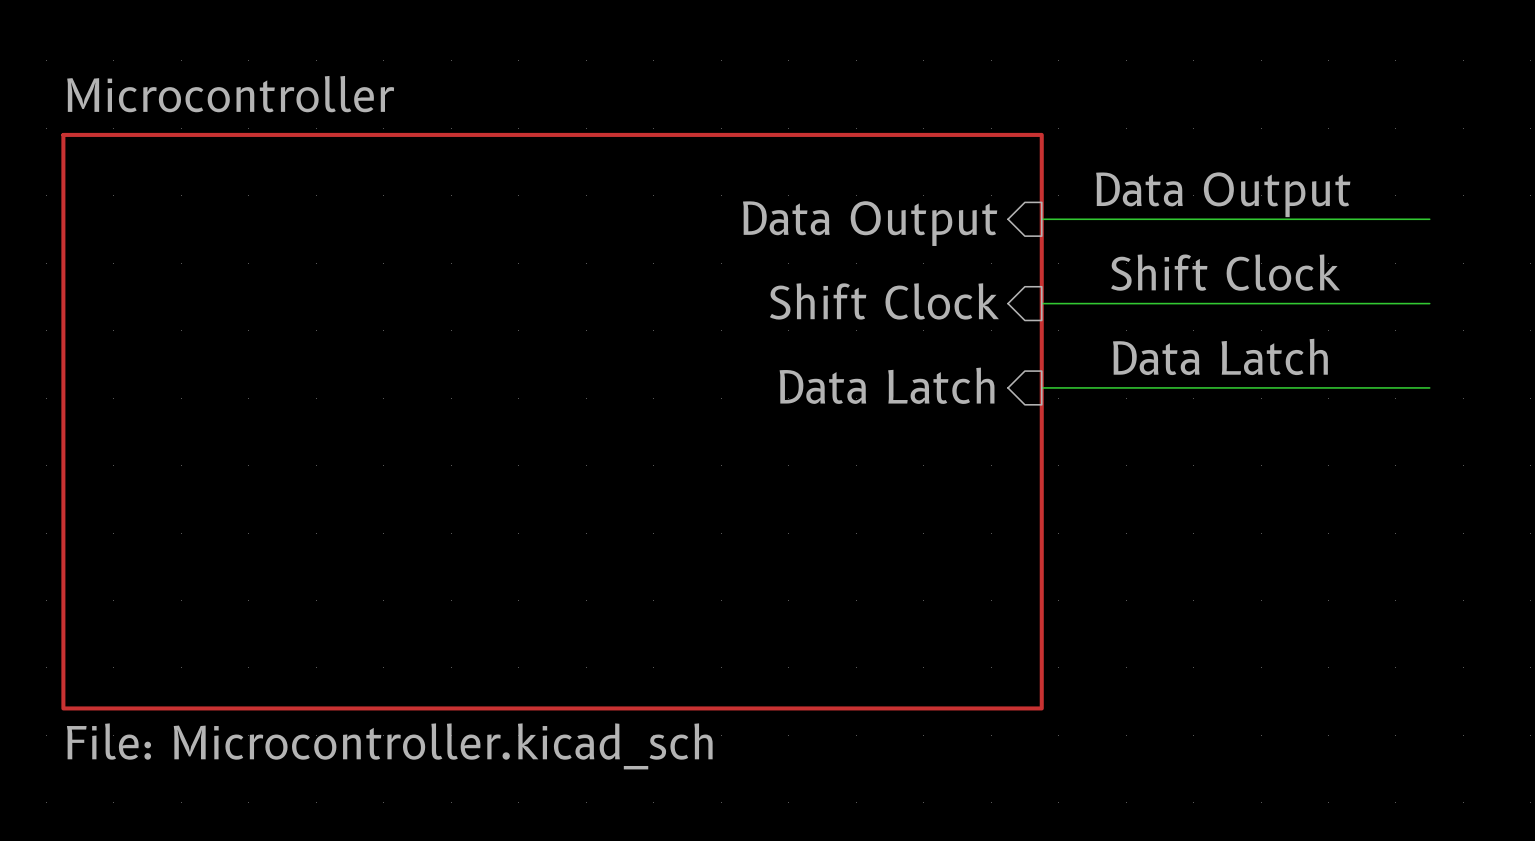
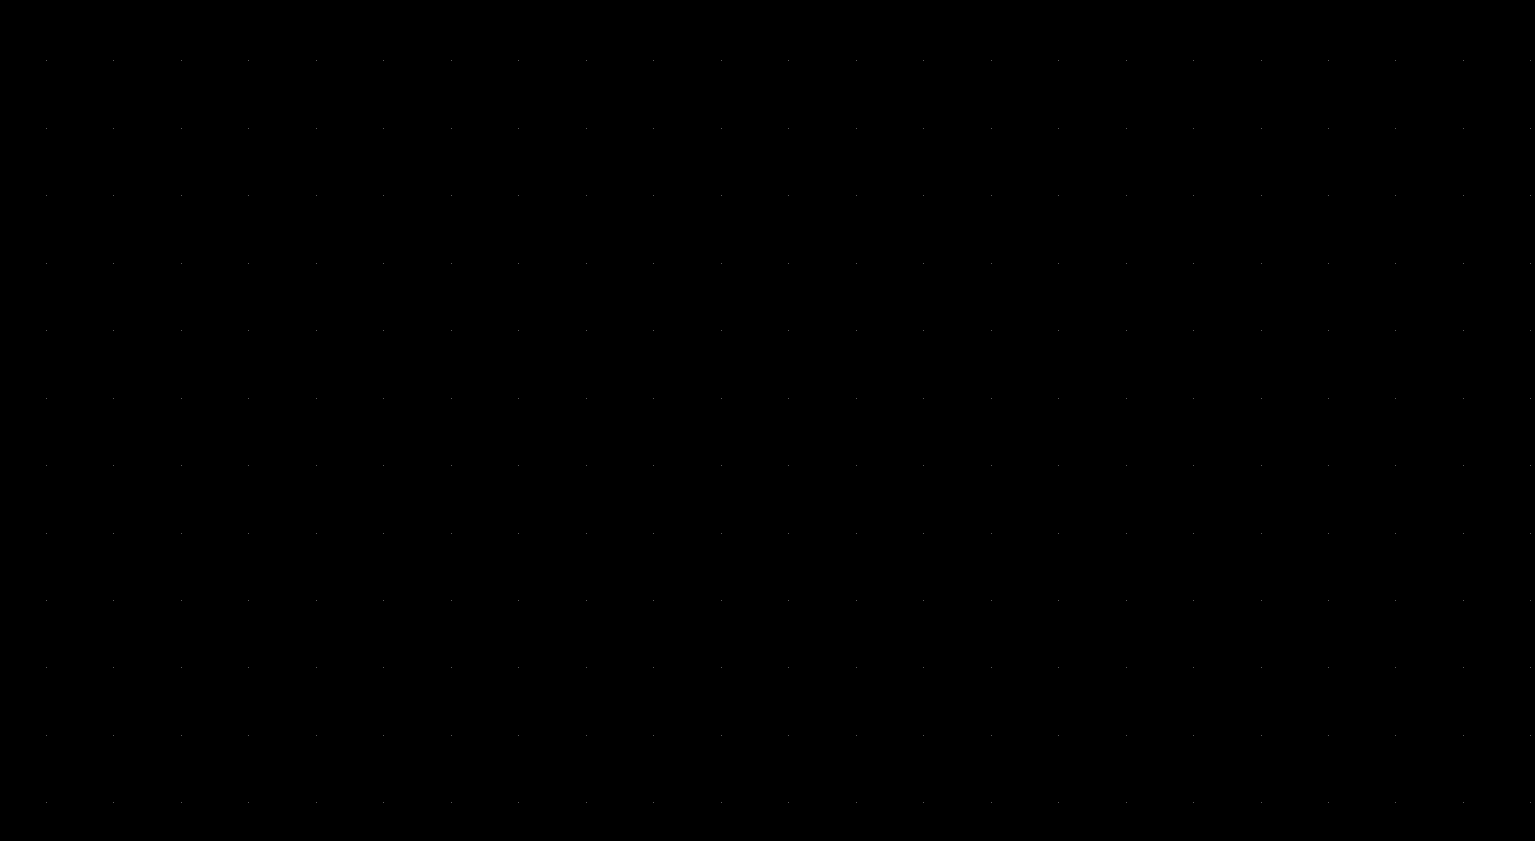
label: Data Output (1223, 194) -> none
wire: (1041, 219) (1429, 219) -> none
sheet pin: Data Output (870, 223) -> none
label: Shift Clock (1225, 272) -> none
sheet pin: Shift Clock (884, 301) -> none
wire: (1041, 303) (1429, 303) -> none
label: Data Latch (1220, 356) -> none
sheet pin: Data Latch (887, 385) -> none
wire: (1041, 387) (1429, 387) -> none
sheet Microcontroller: File: Microcontroller.kicad_sch (552, 421) -> none

